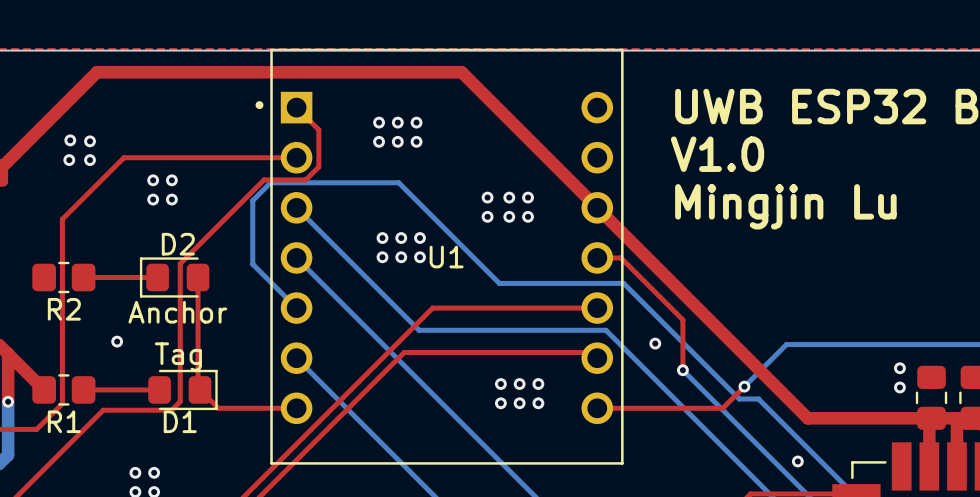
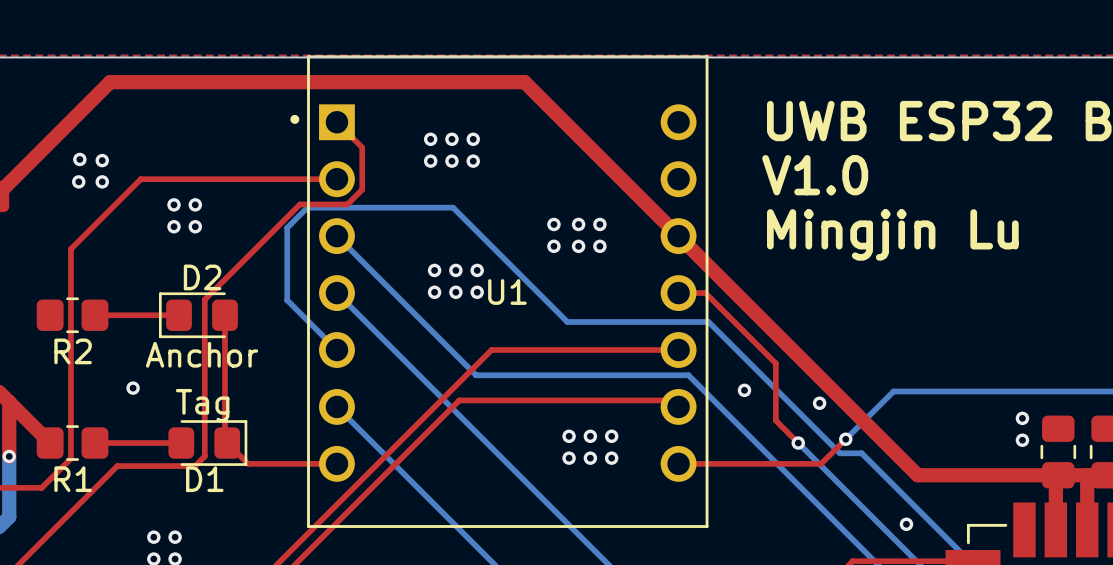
via: none -> (819, 403)
top track: none -> (775, 420) (798, 443)
bottom track: (682, 370) (702, 389) -> none
via: (682, 370) -> none
via: none -> (798, 443)

